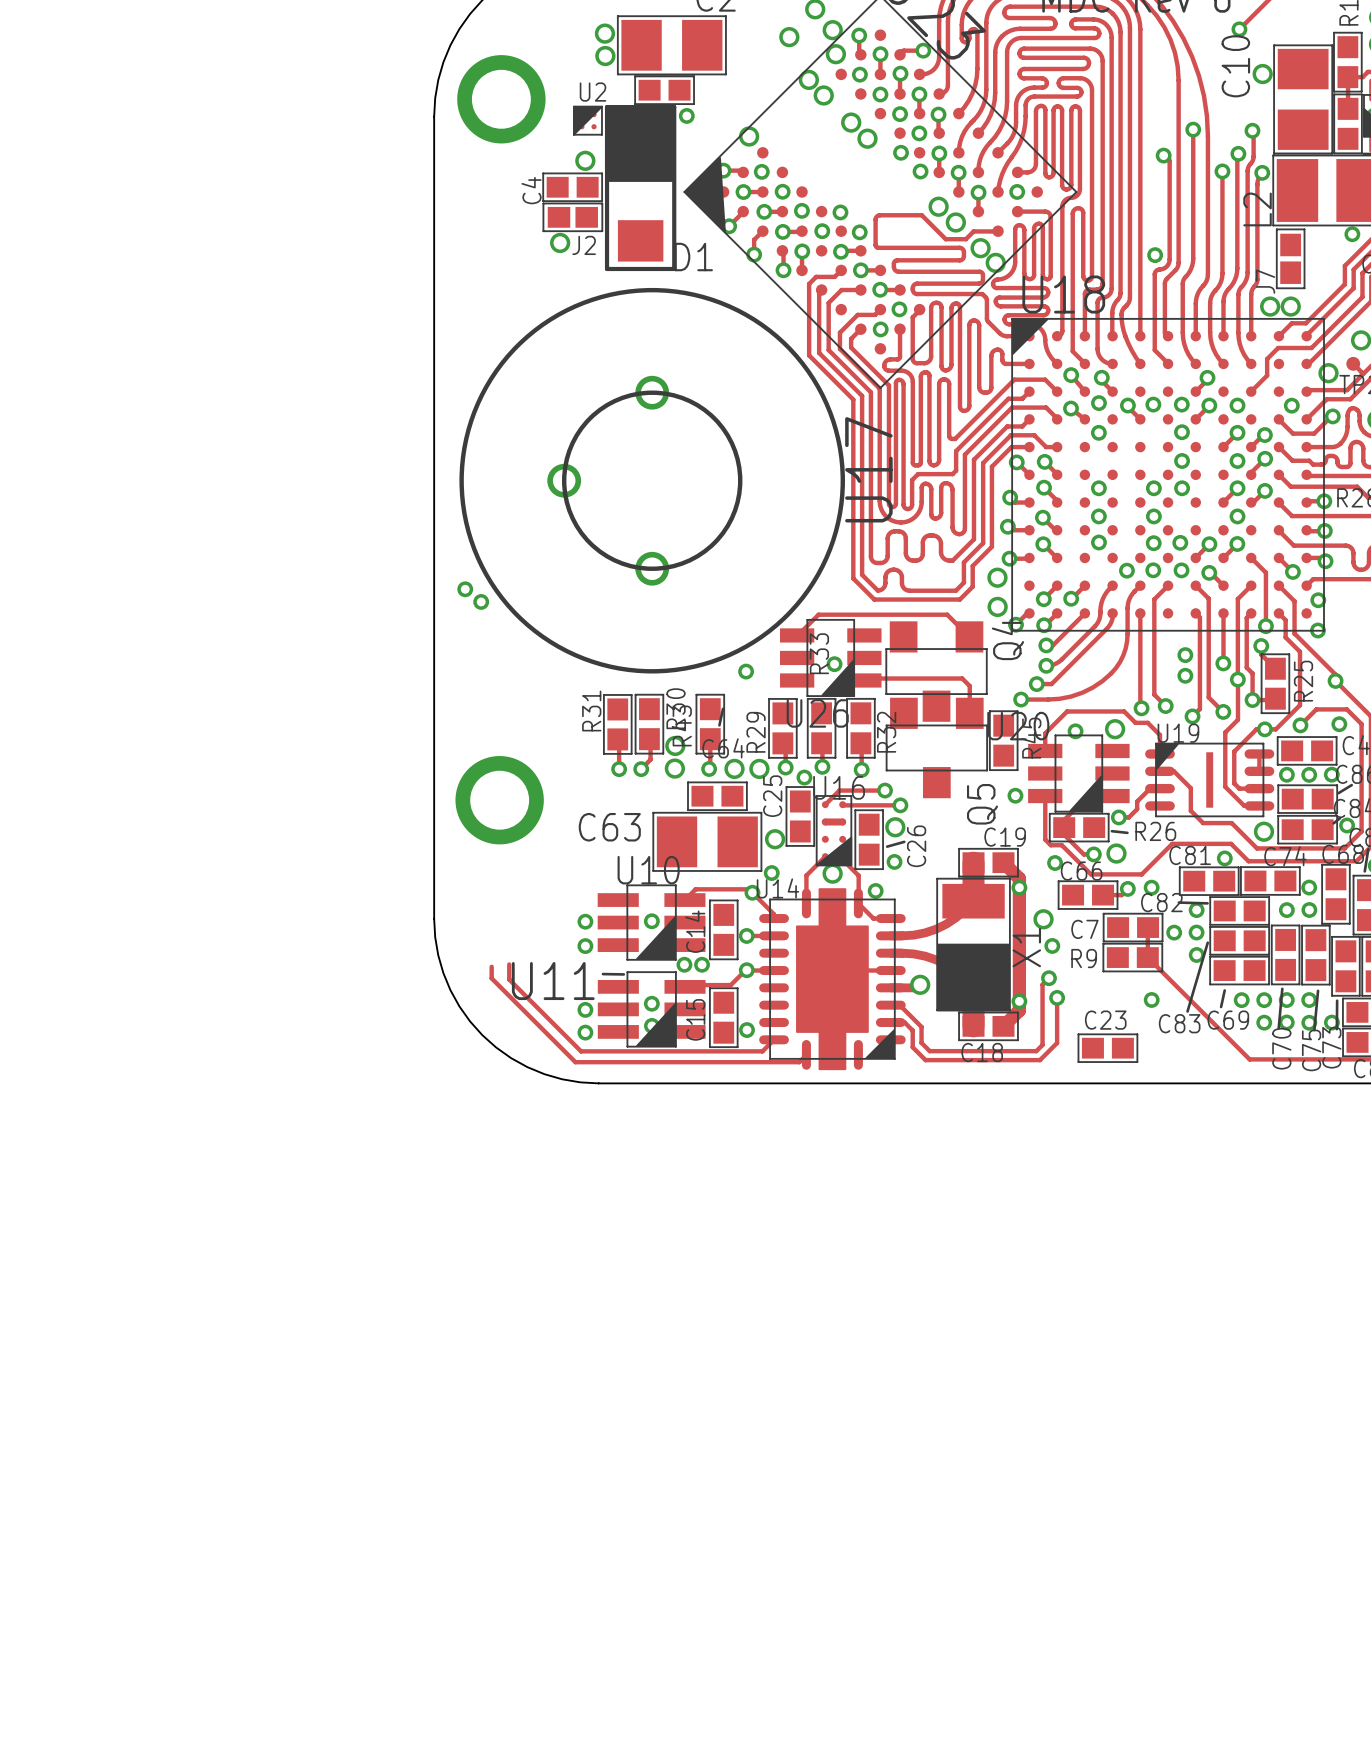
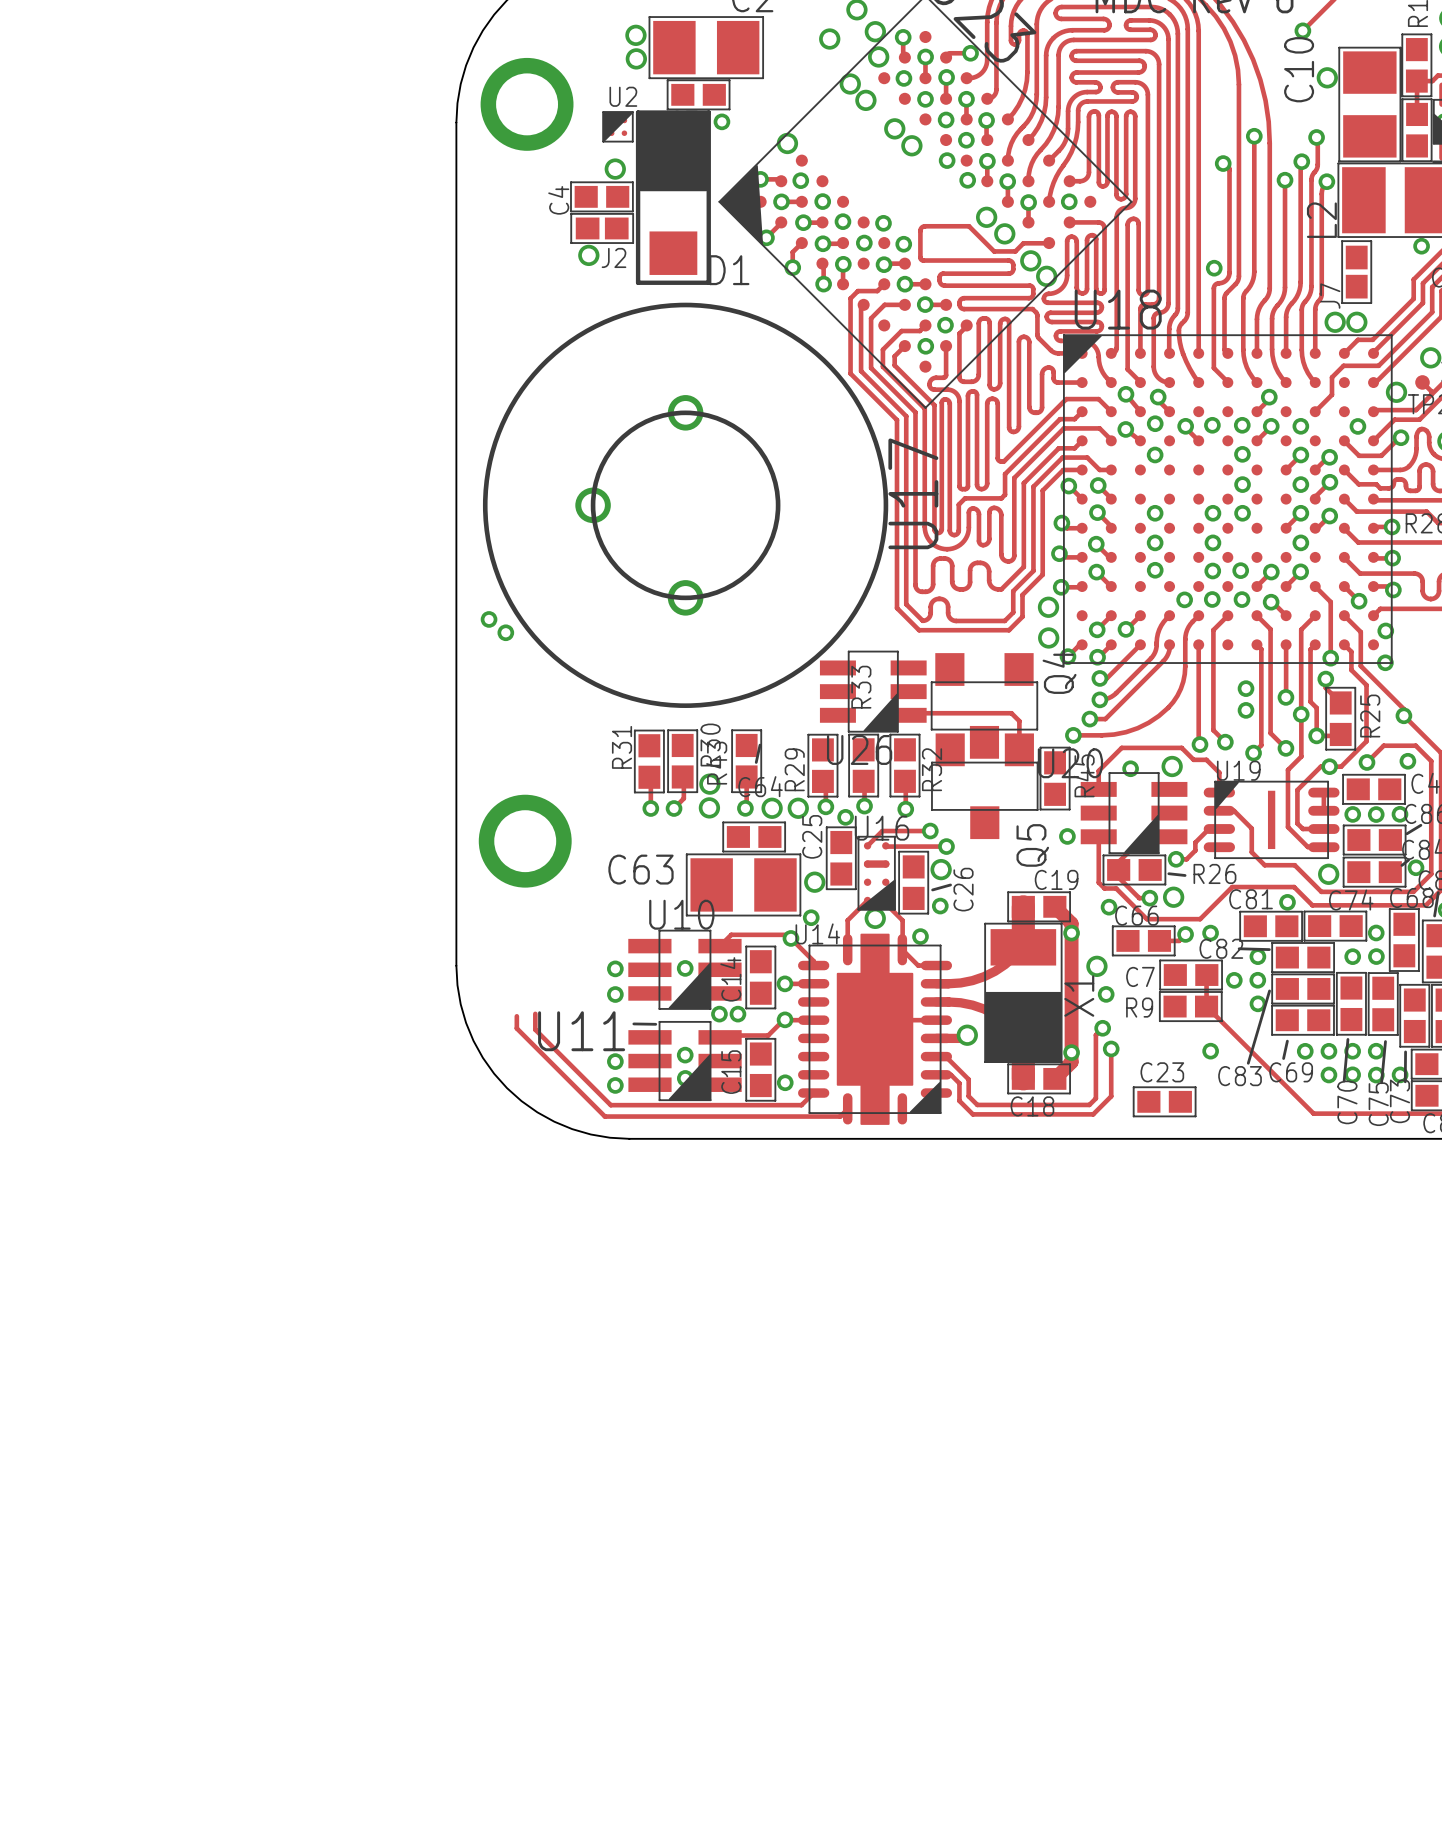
track: (797, 635) (818, 614) (947, 614) (969, 636) -> none
via: (834, 664) -> none
via: (746, 671) -> none

